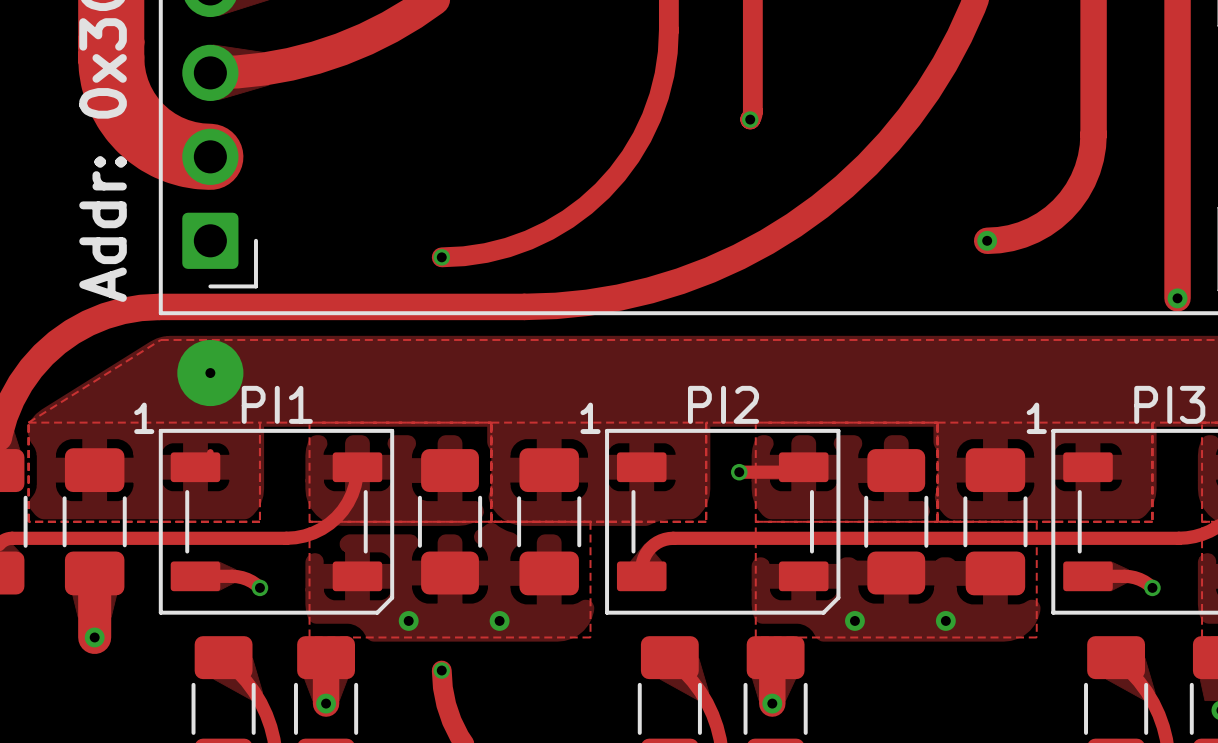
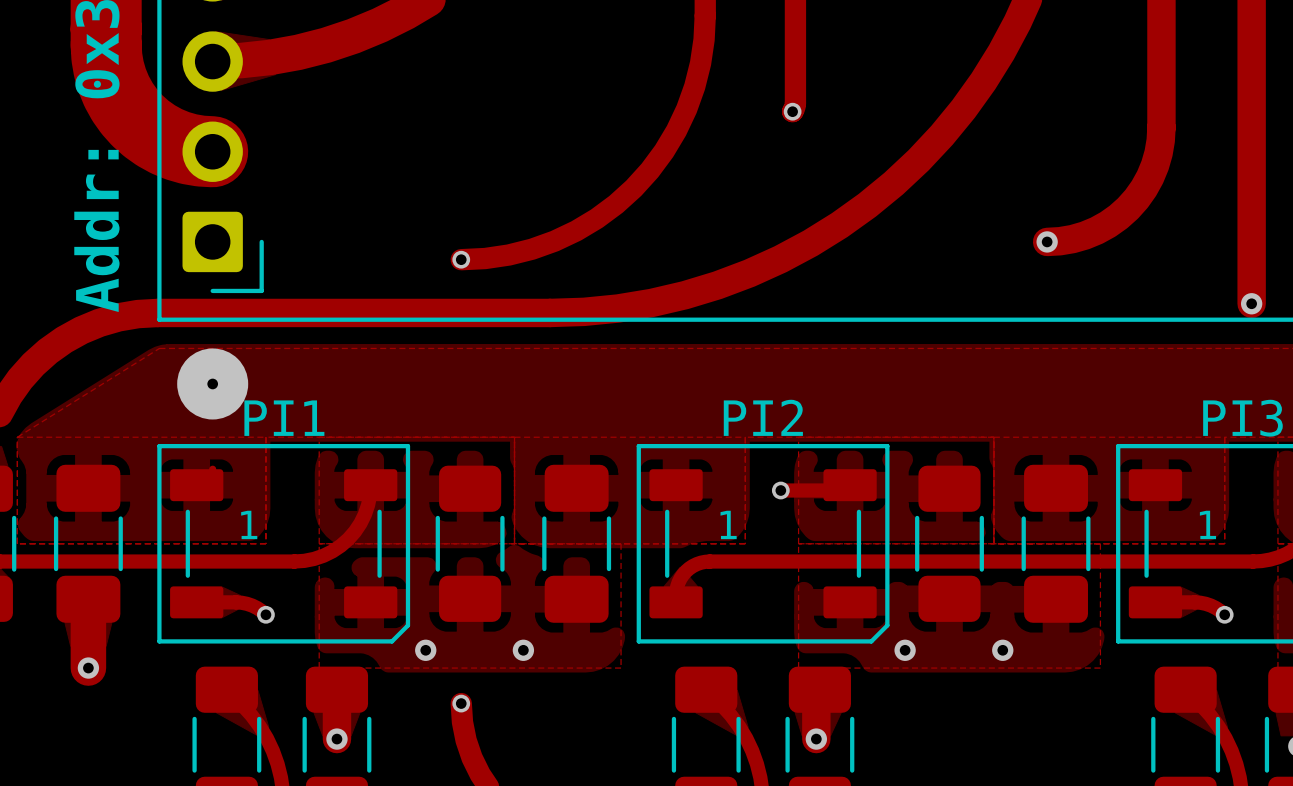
PI1 text position: 1 (144, 418) -> 1 (249, 524)
PI2 text position: 1 (590, 418) -> 1 (728, 524)
PI3 text position: 1 (1036, 418) -> 1 (1207, 524)

